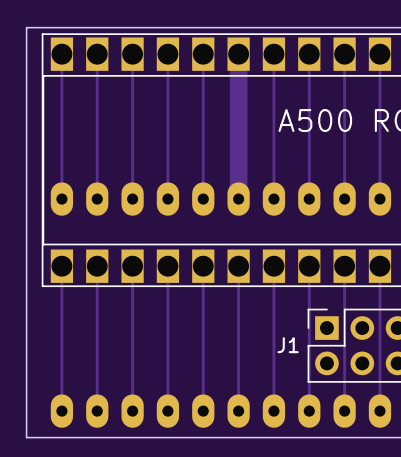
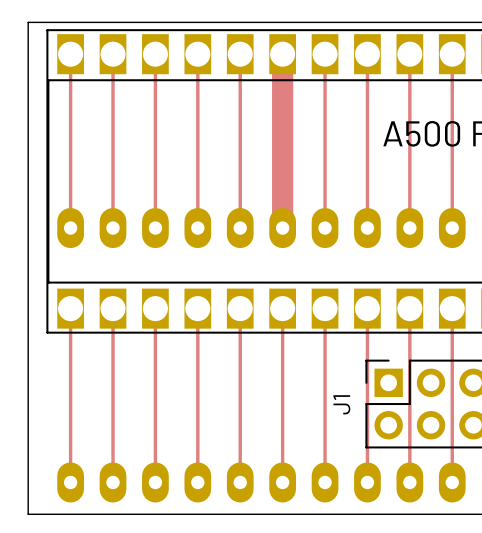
J1 name rotation: 0° (288, 345) -> 90° counterclockwise (341, 404)

